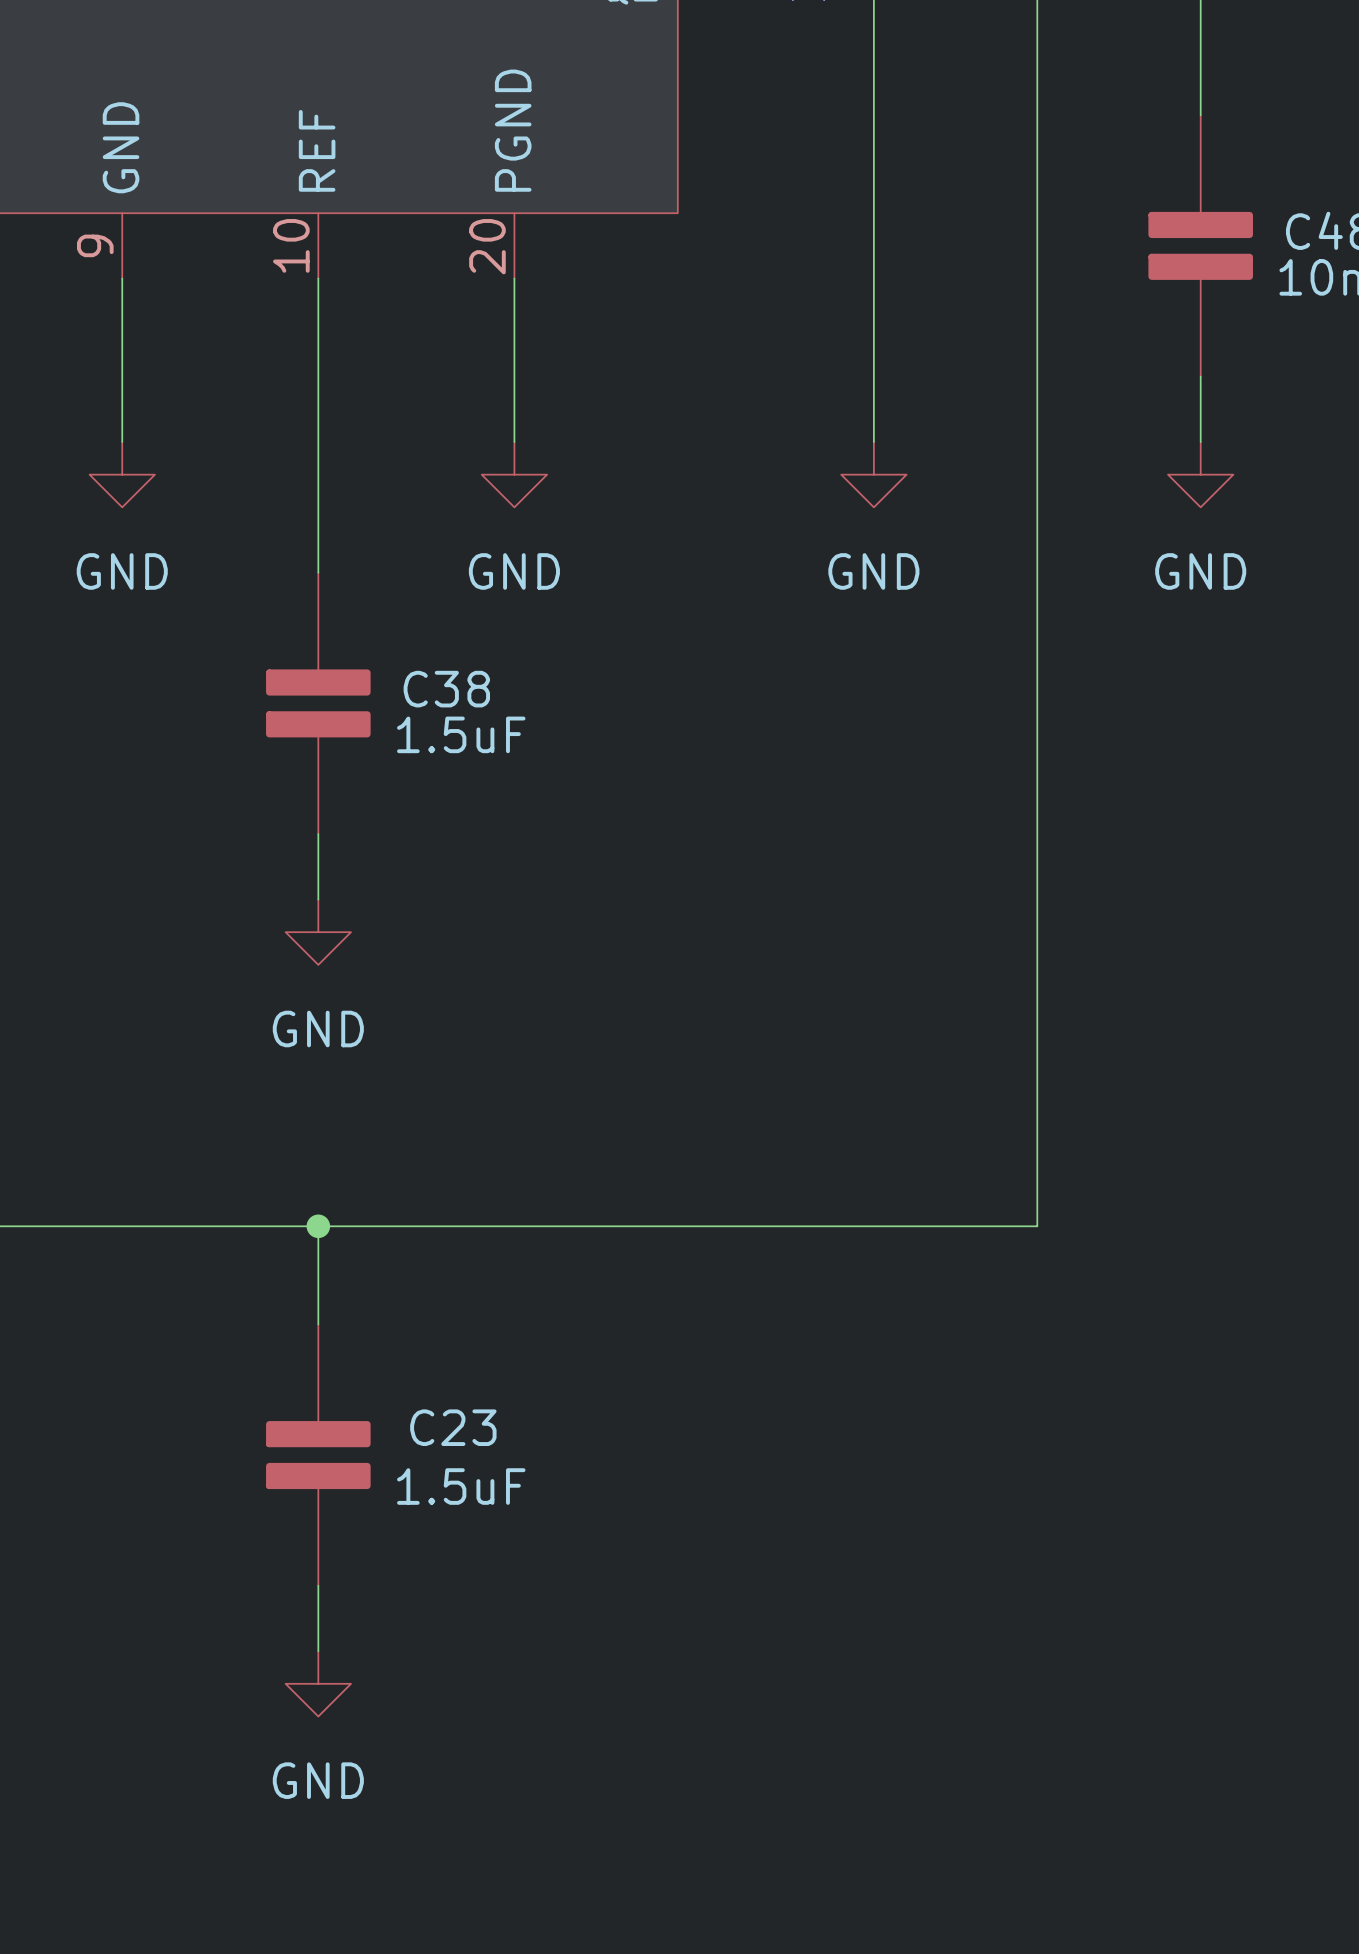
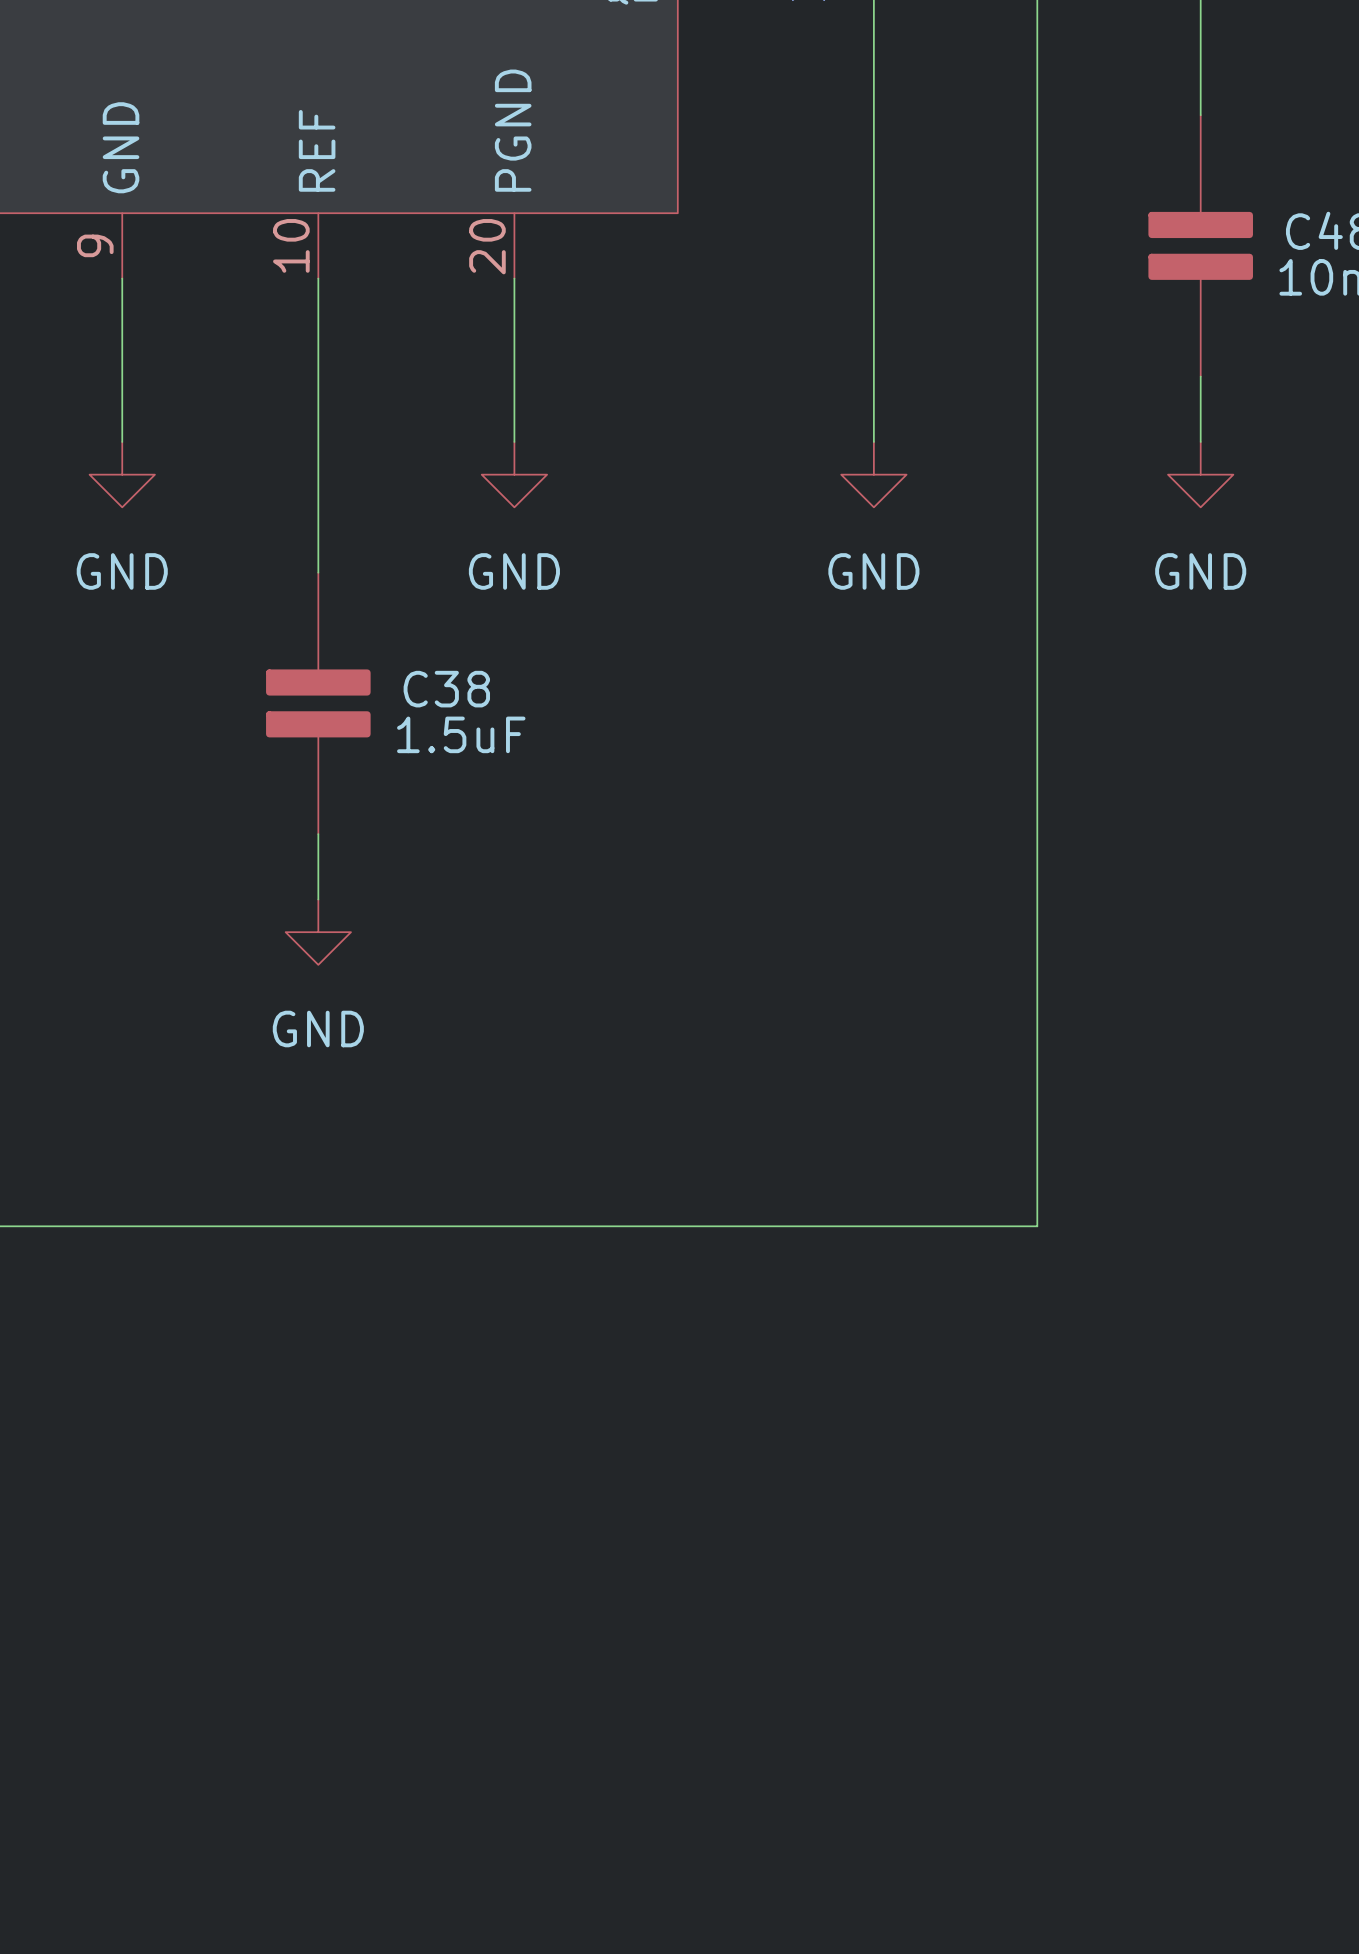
wire: (318, 1226) (318, 1324) -> none
junction: (318, 1226) -> none
C23: 1.5uF (318, 1455) -> none
wire: (318, 1585) (318, 1651) -> none
power symbol: GND (318, 1683) -> none

